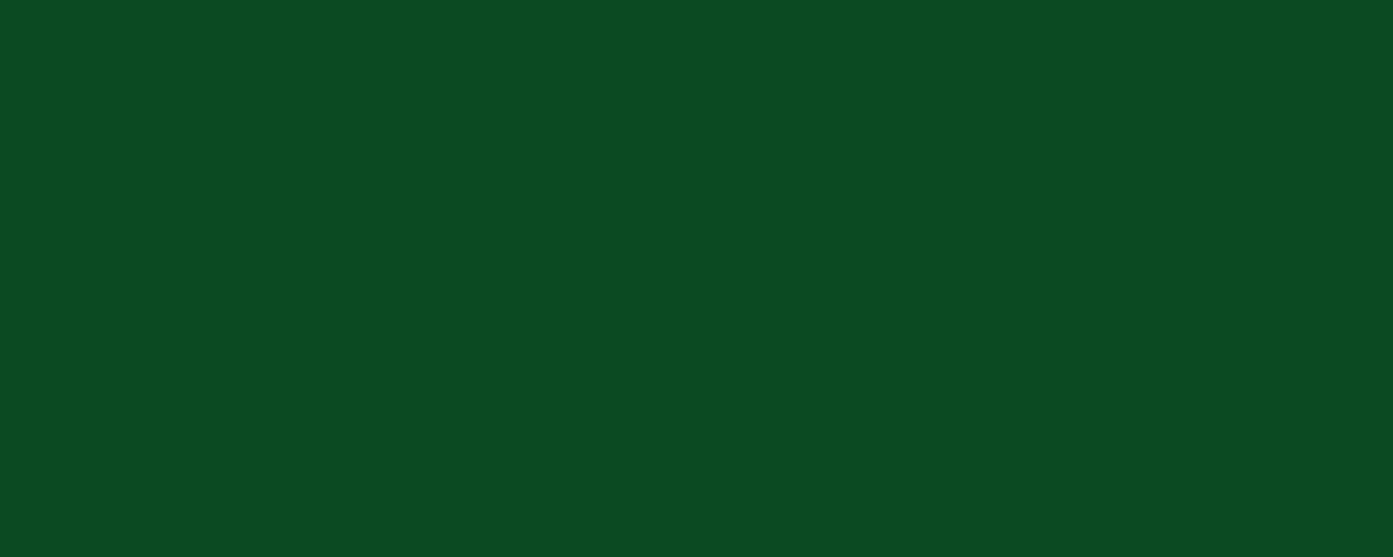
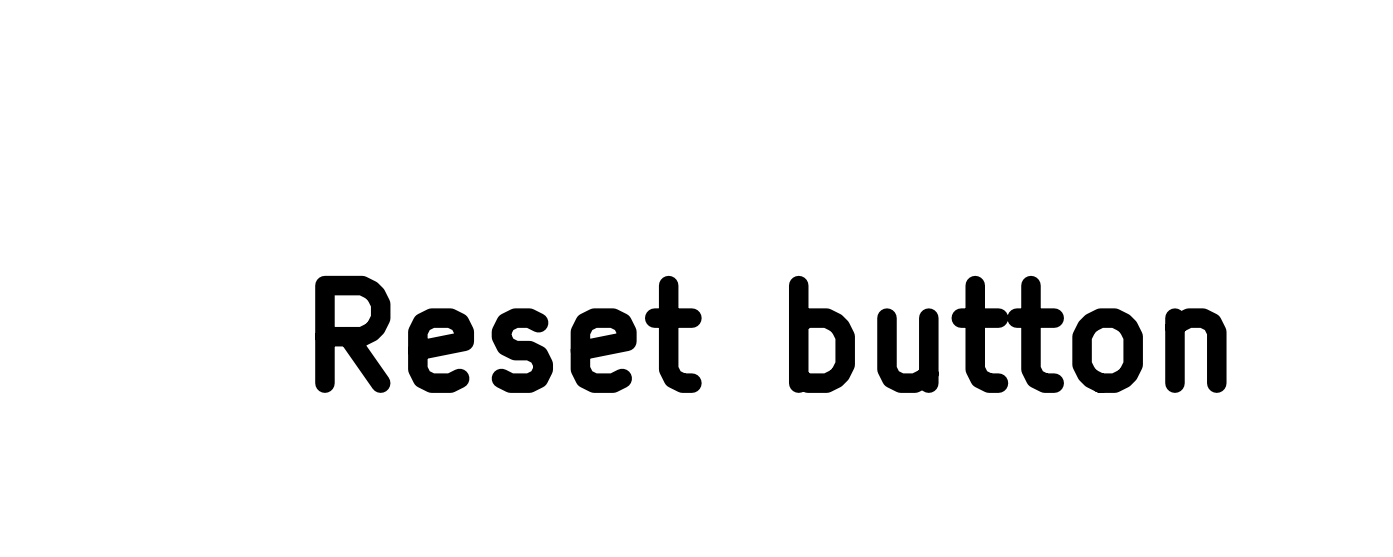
text: none -> Reset button (770, 334)

